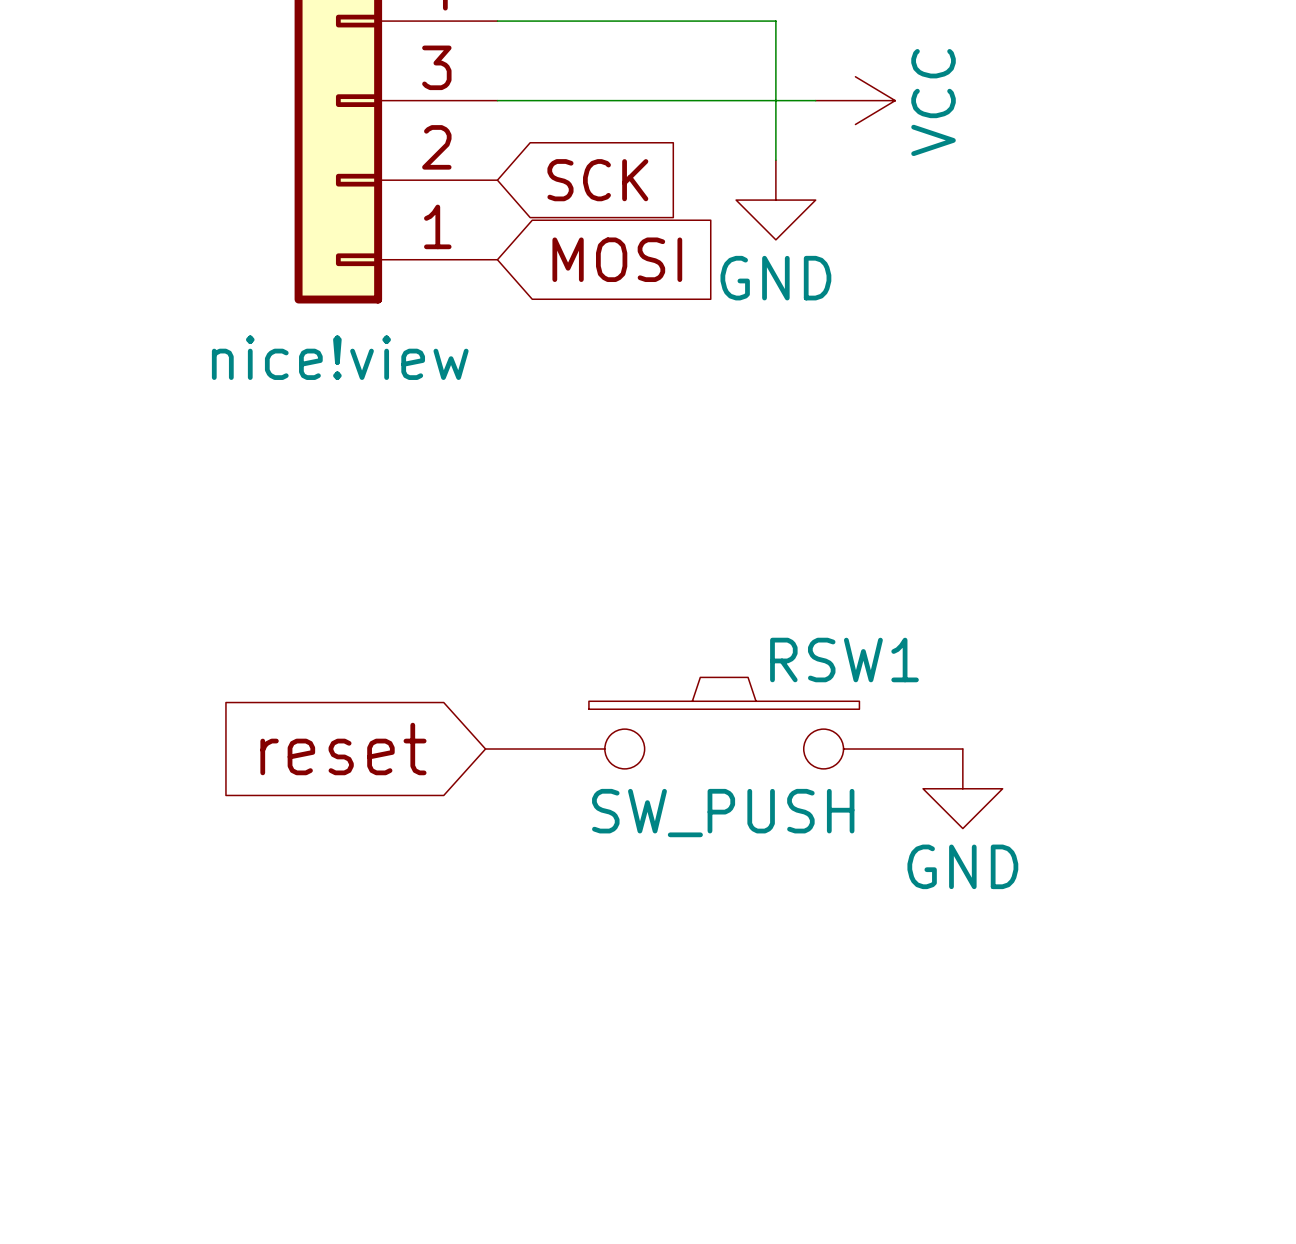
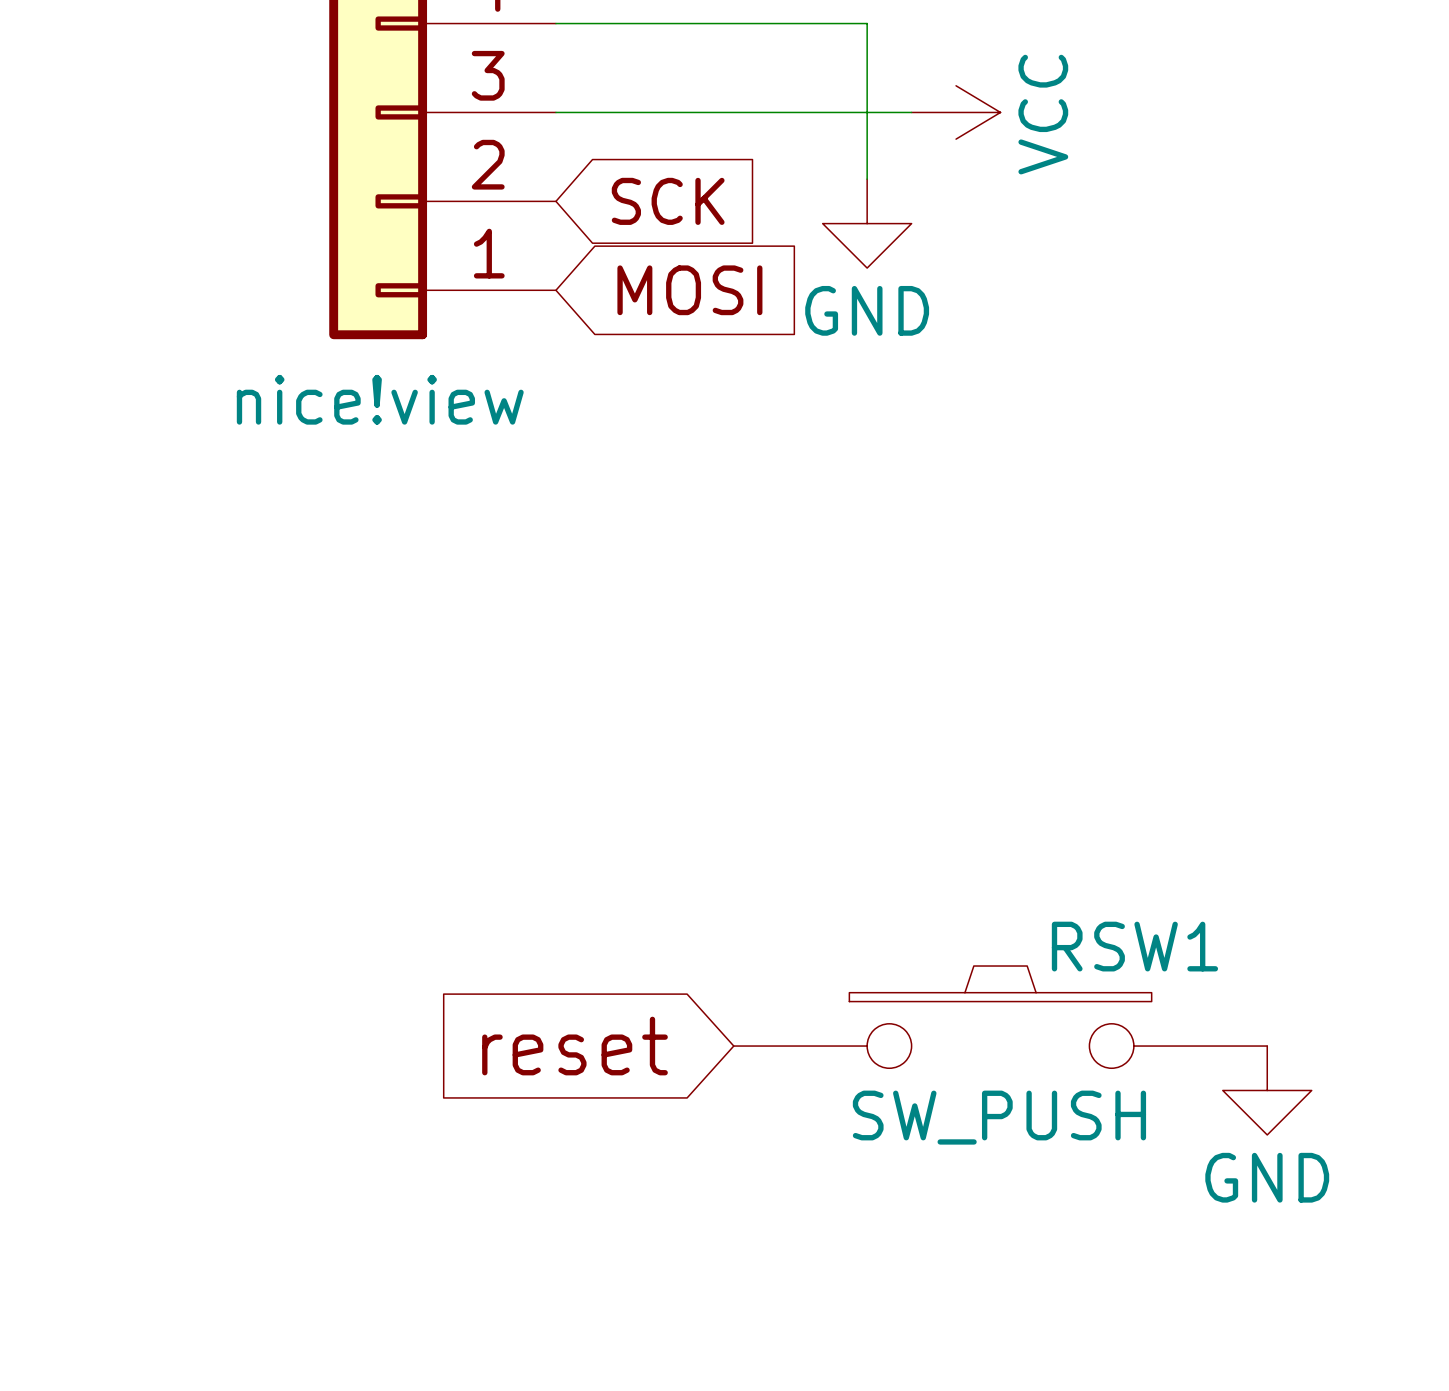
RSW1 position: (724, 723) -> (1000, 1017)
global label position: reset (343, 749) -> reset (574, 1046)
power symbol position: GND (962, 788) -> GND (1267, 1090)

